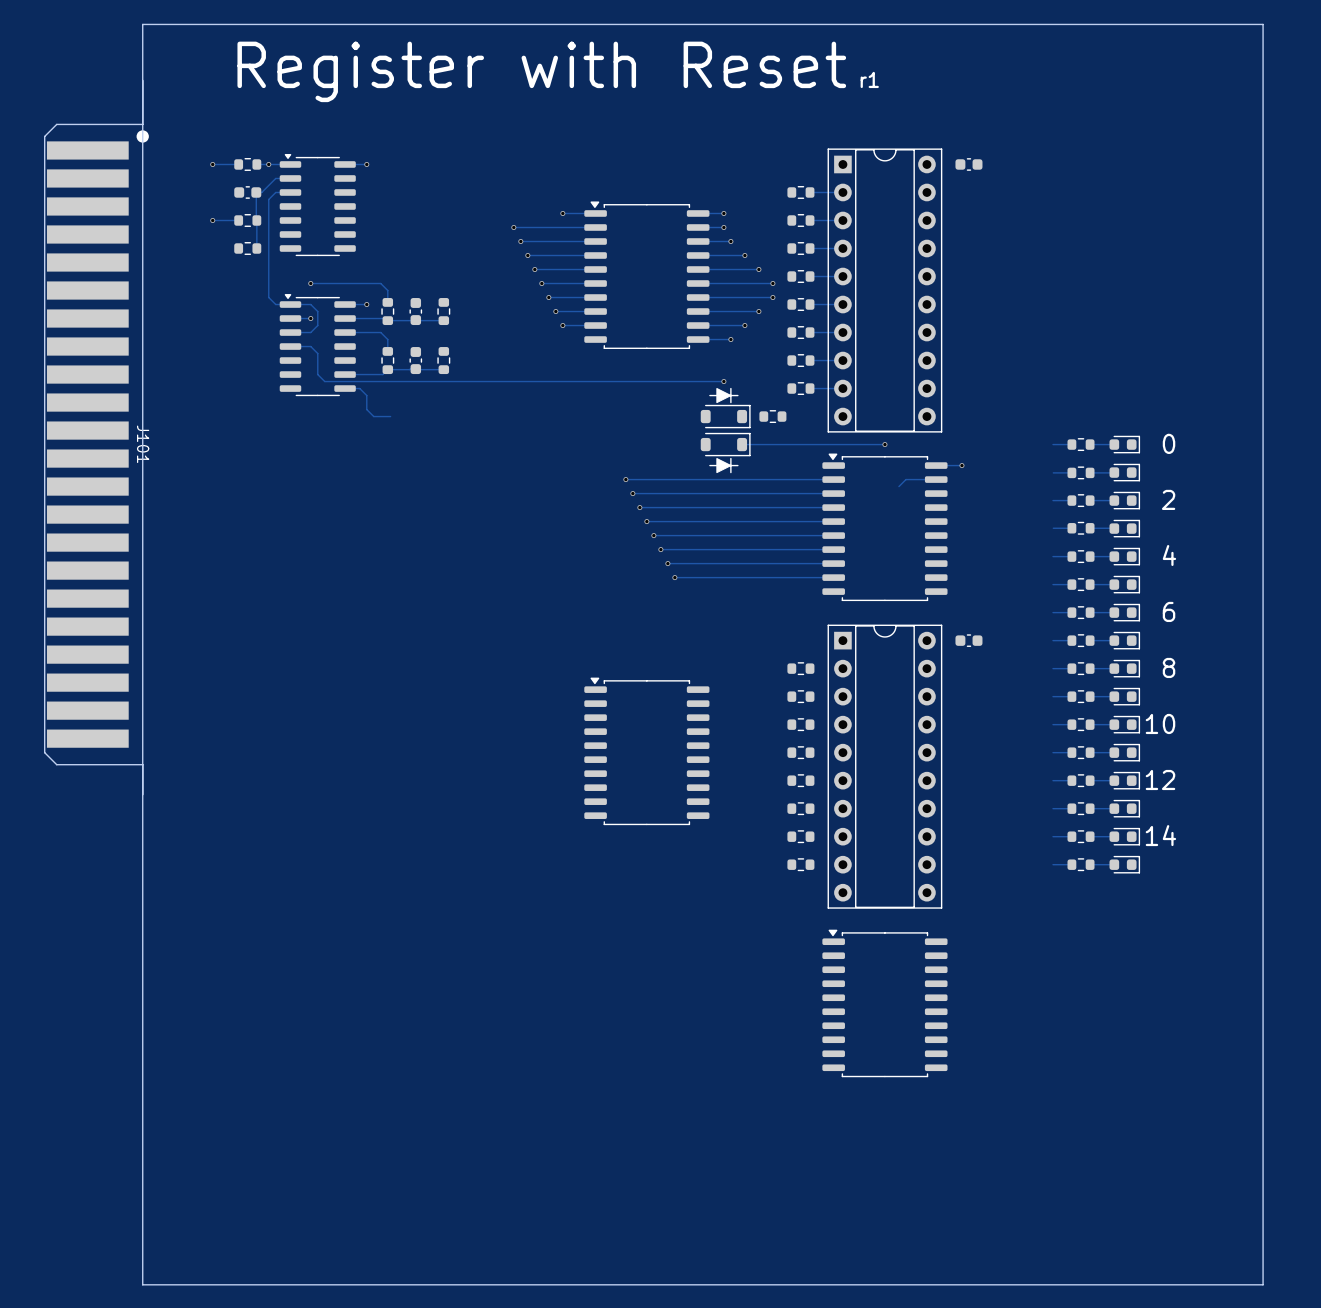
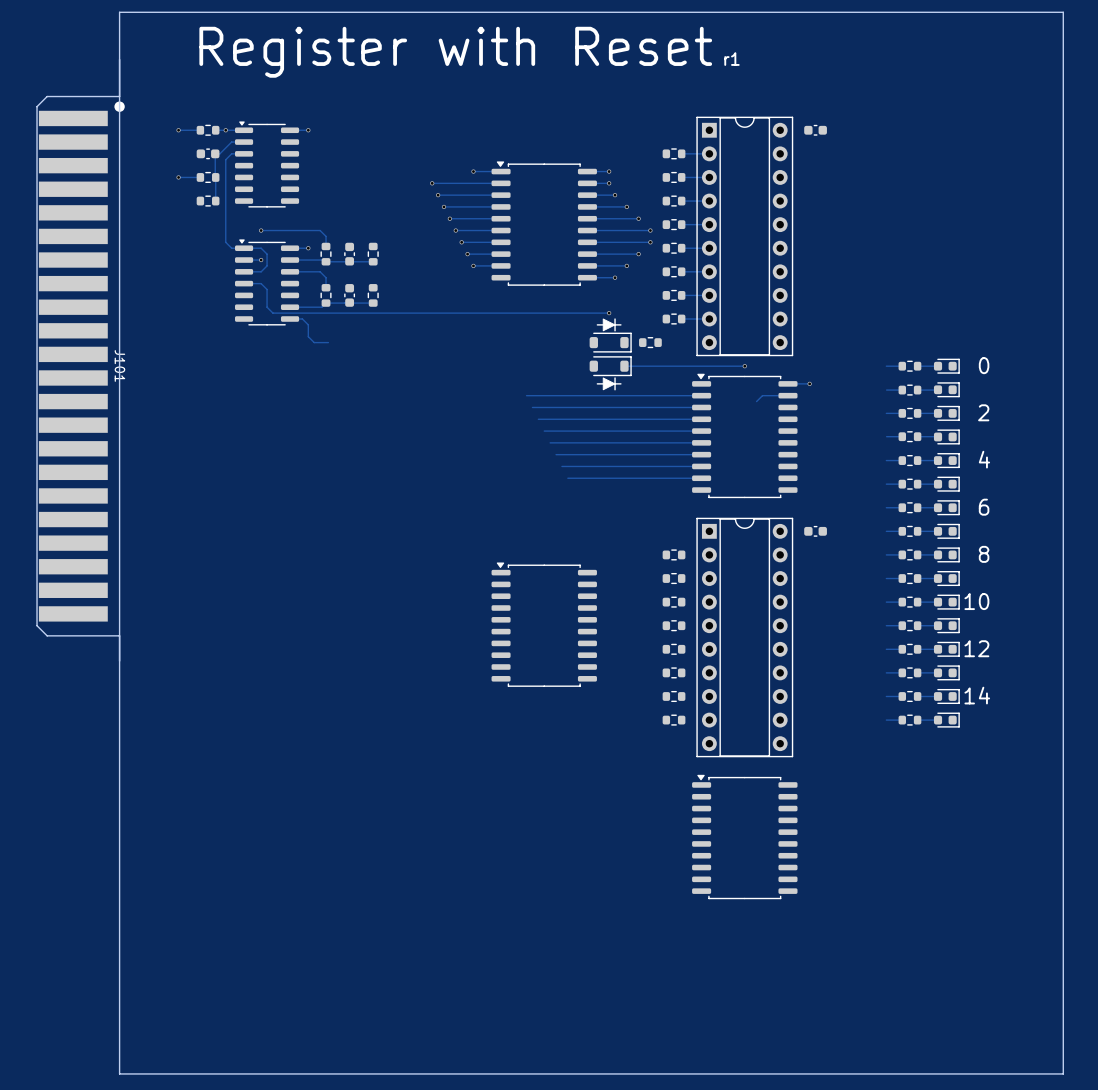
via: (625, 479) -> none
via: (632, 493) -> none
via: (639, 507) -> none
via: (646, 521) -> none
via: (653, 535) -> none
via: (660, 549) -> none
via: (667, 563) -> none
via: (674, 577) -> none

